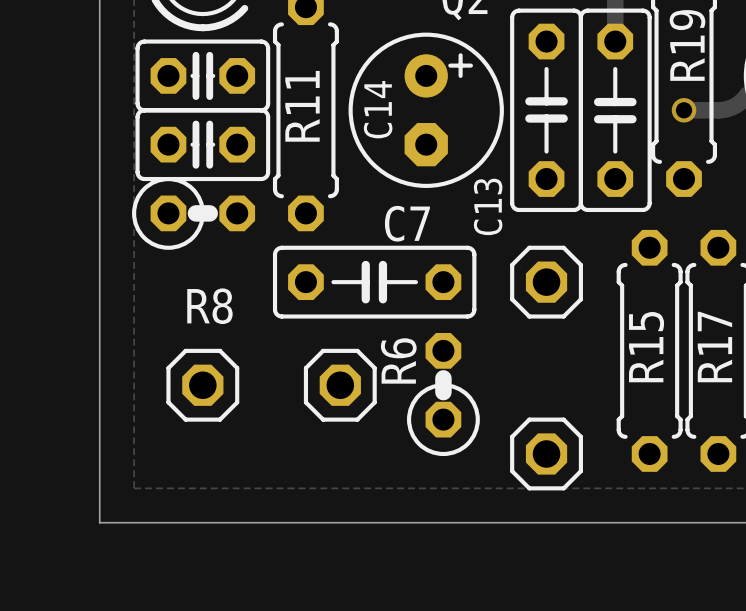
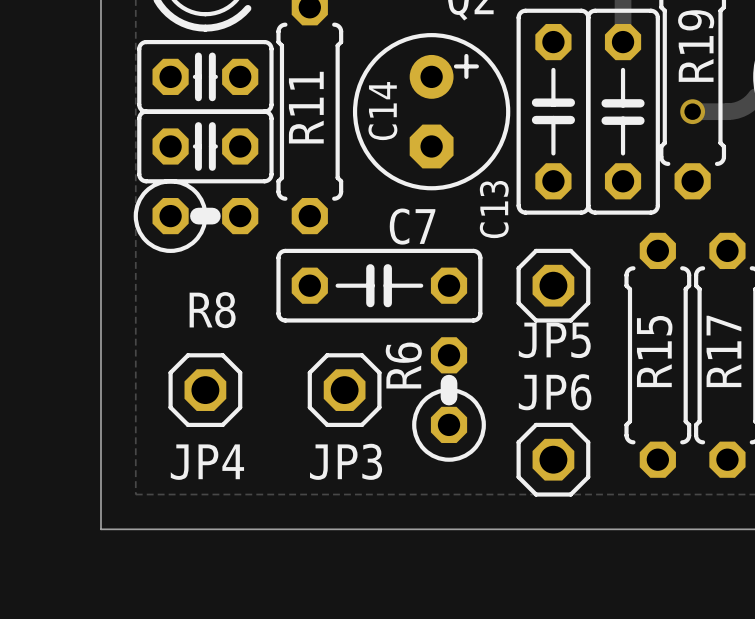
JP5 name: none -> JP5 (554, 340)
JP6 name: none -> JP6 (555, 392)
JP4 name: none -> JP4 (207, 462)
JP3 name: none -> JP3 (346, 461)

